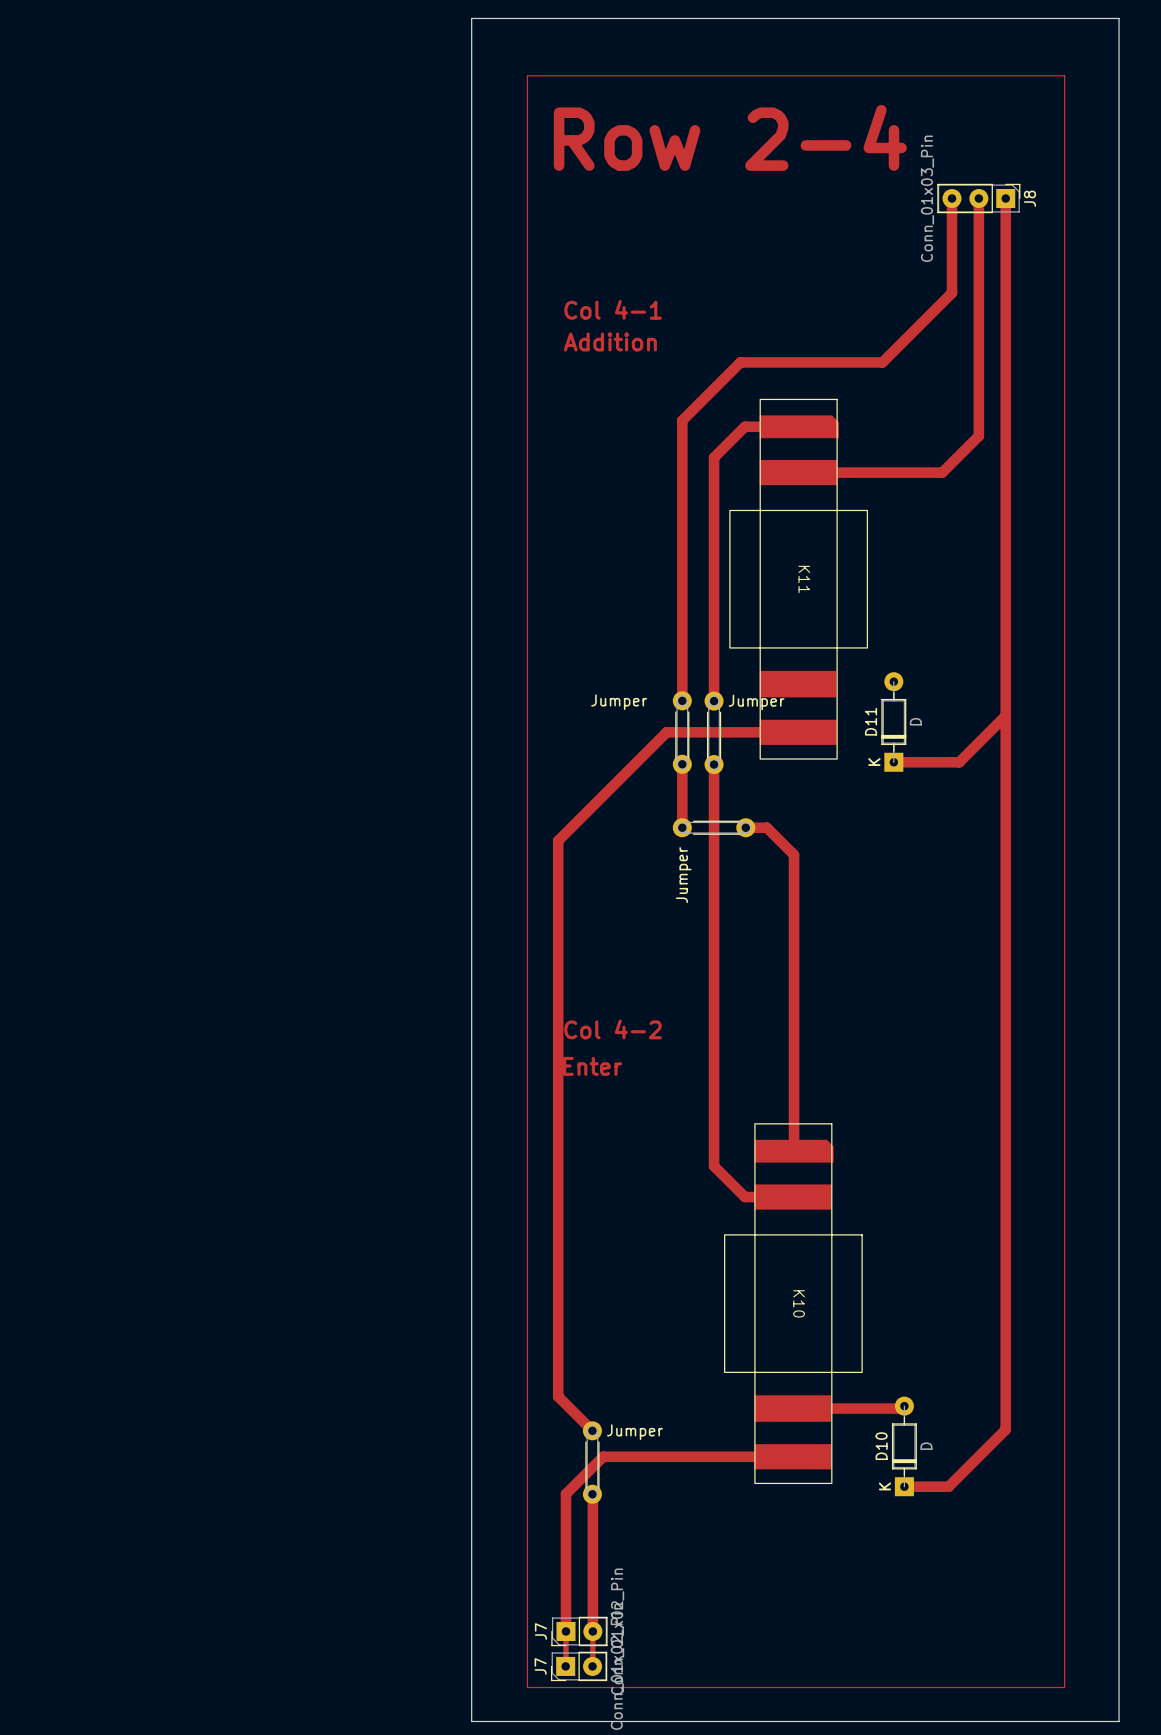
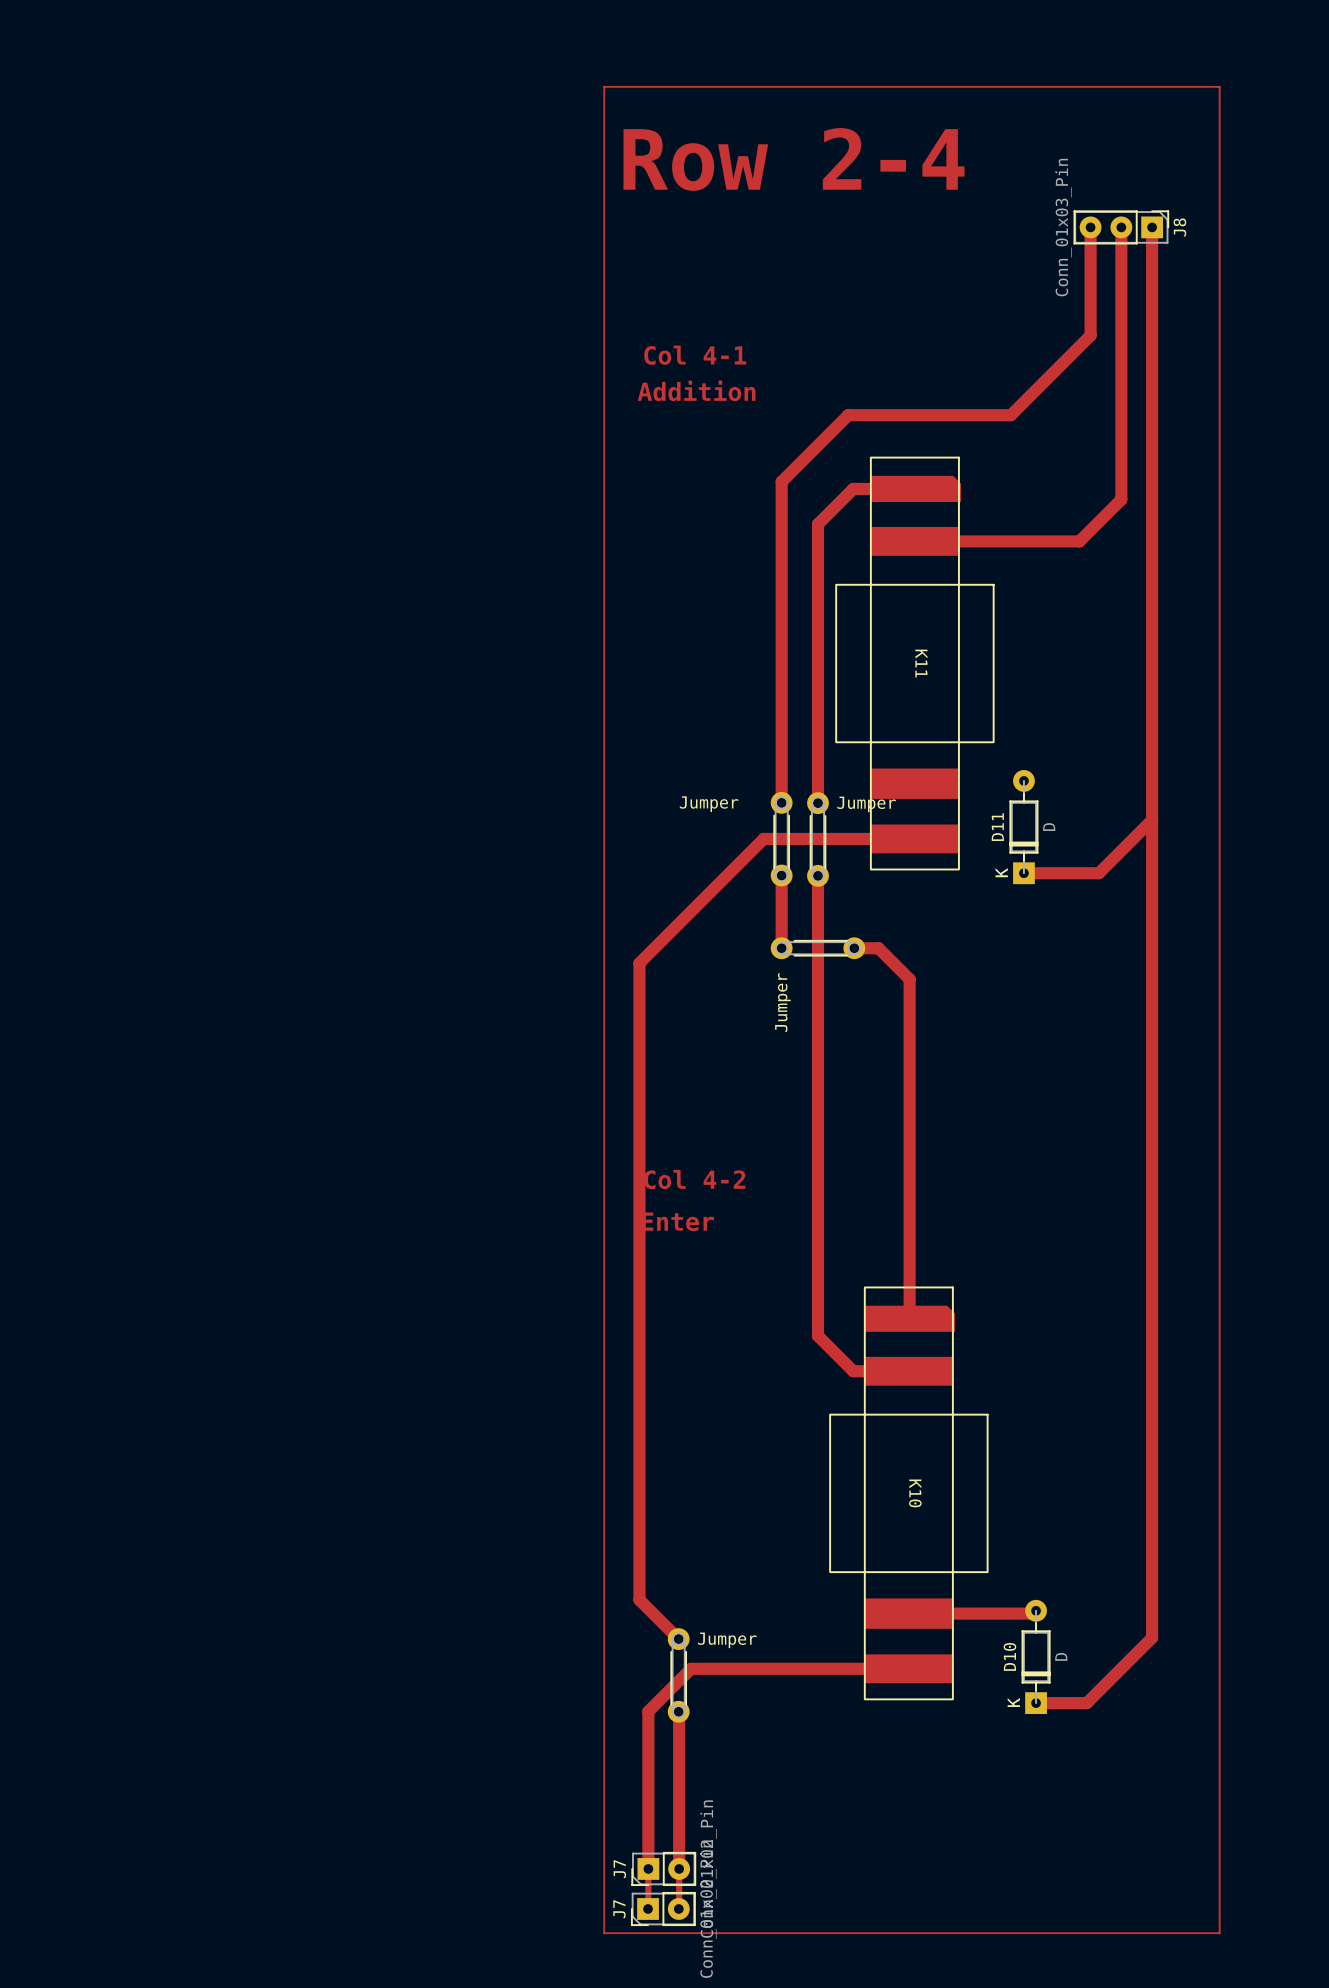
board edge: (471, 18) (1119, 18) (1119, 1721) (471, 1721) (471, 18) -> none

